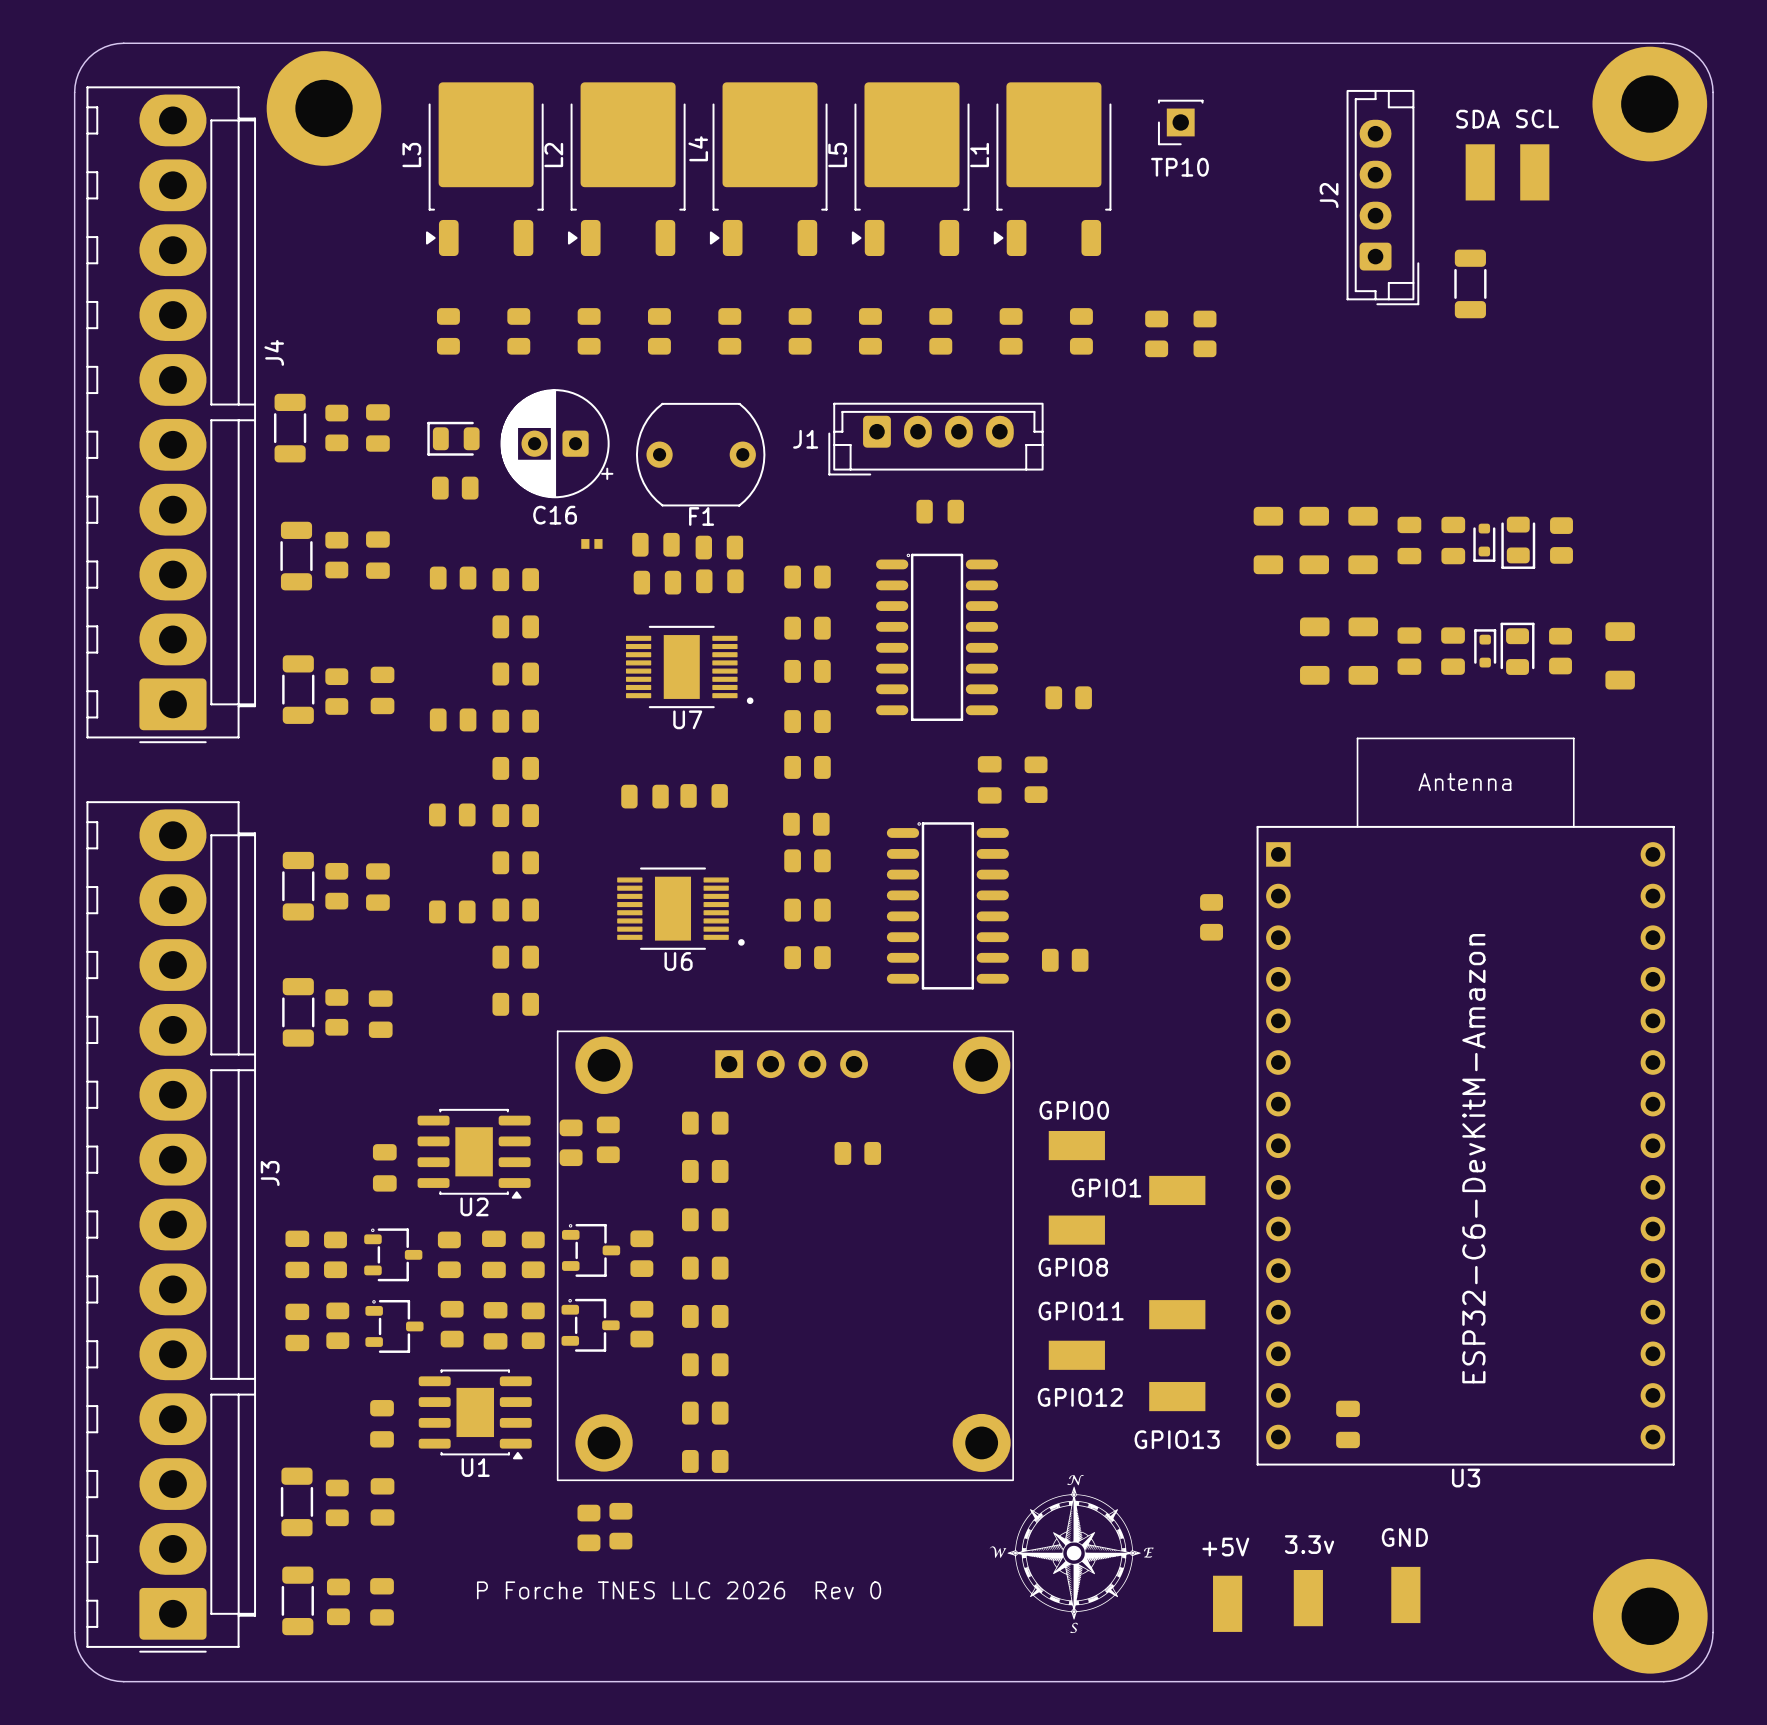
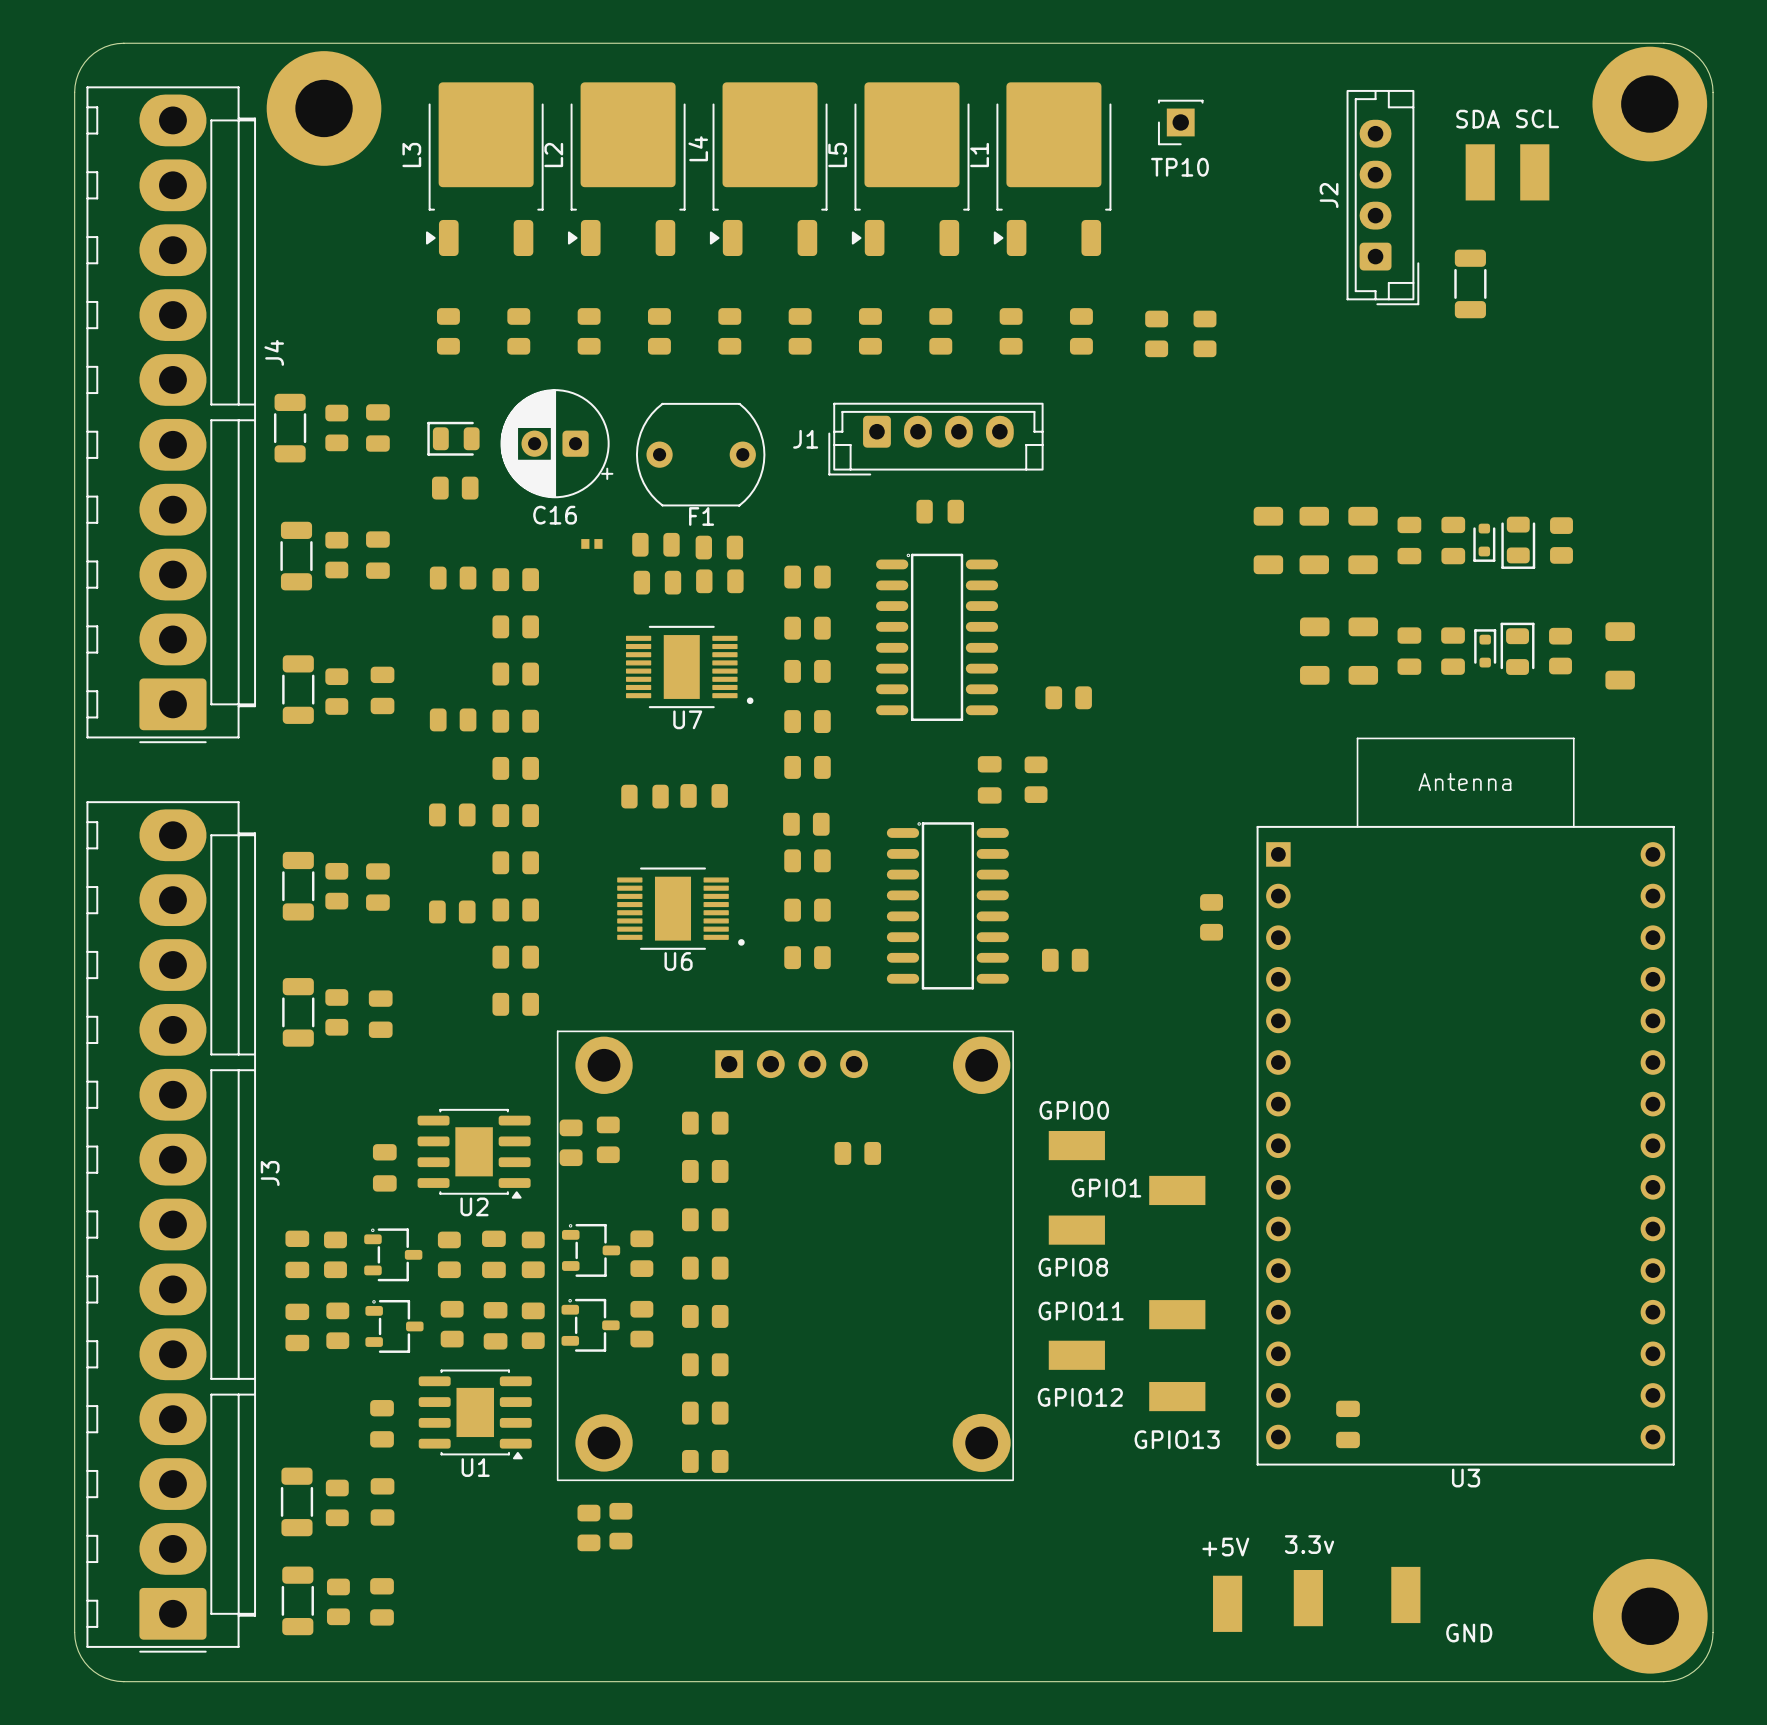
text: ESP32-C6-DevKitM-Amazon (1473, 1158) -> none
drawing: [989, 1474, 1154, 1634] -> none
GND name position: GND (1404, 1537) -> GND (1469, 1633)
text: P Forche TNES LLC 2026 Rev 0 (679, 1590) -> none

